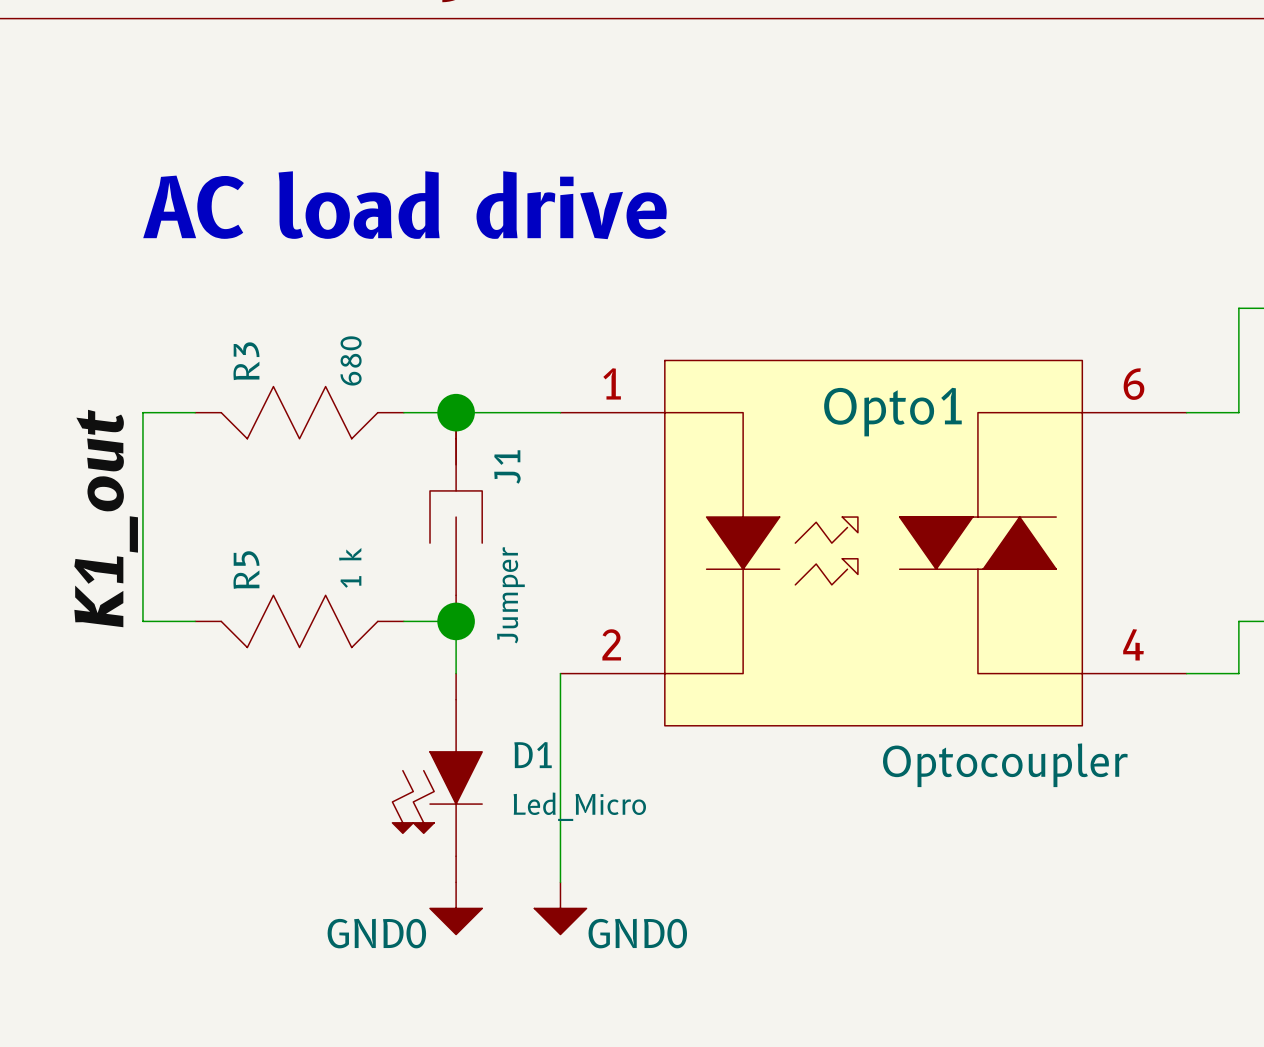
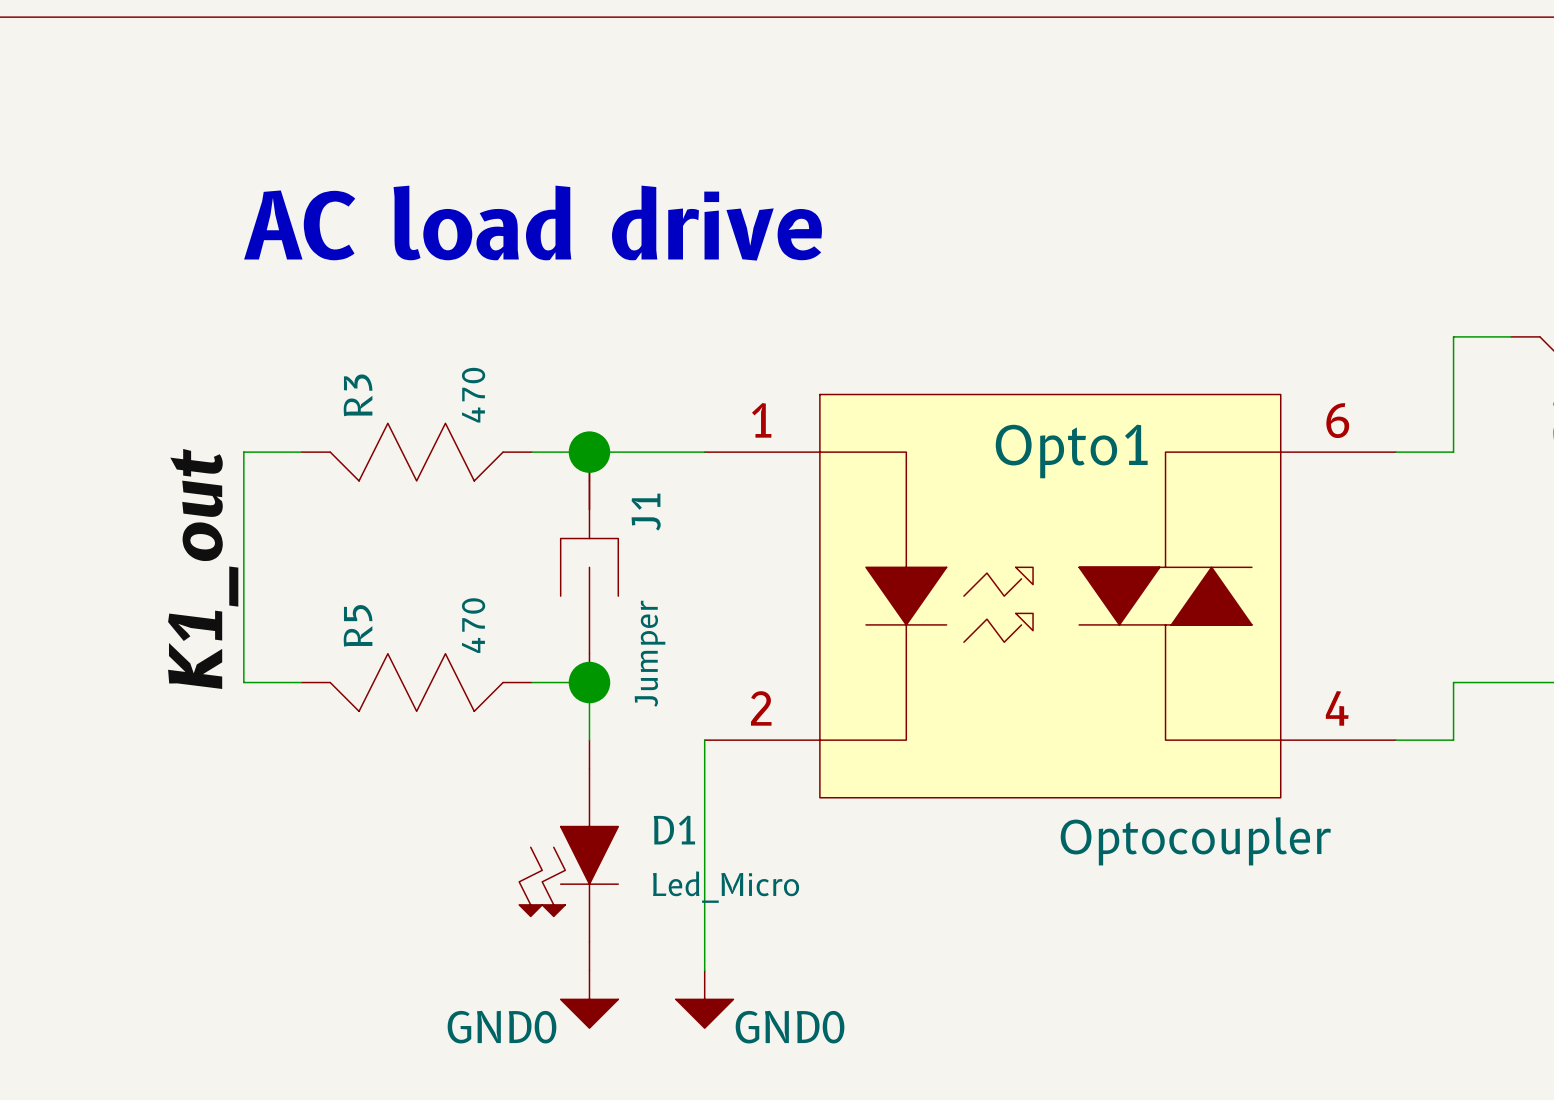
R3 value: 680 (351, 360) -> 470 (473, 395)
R5 value: 1 k (350, 567) -> 470 (473, 625)

